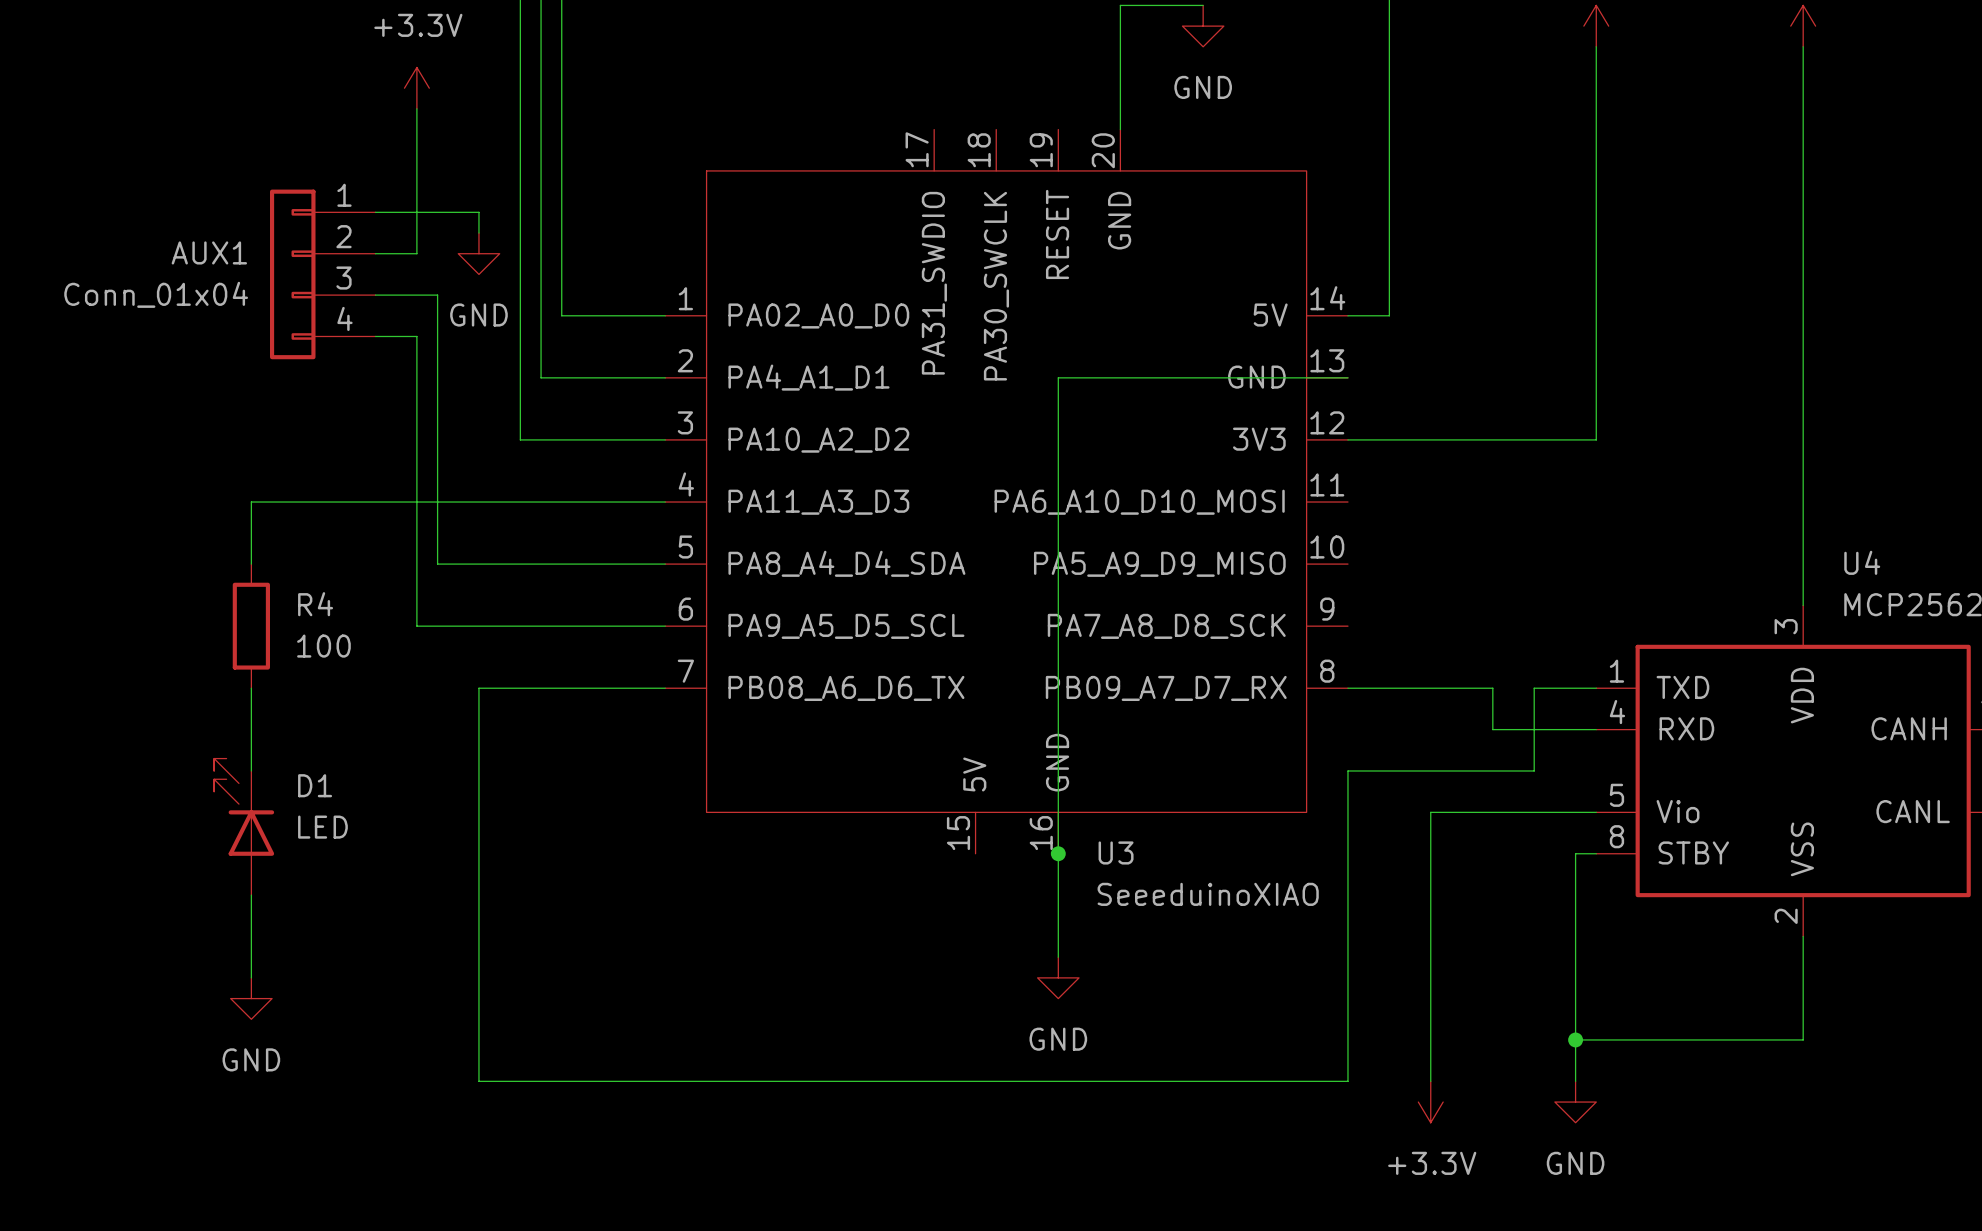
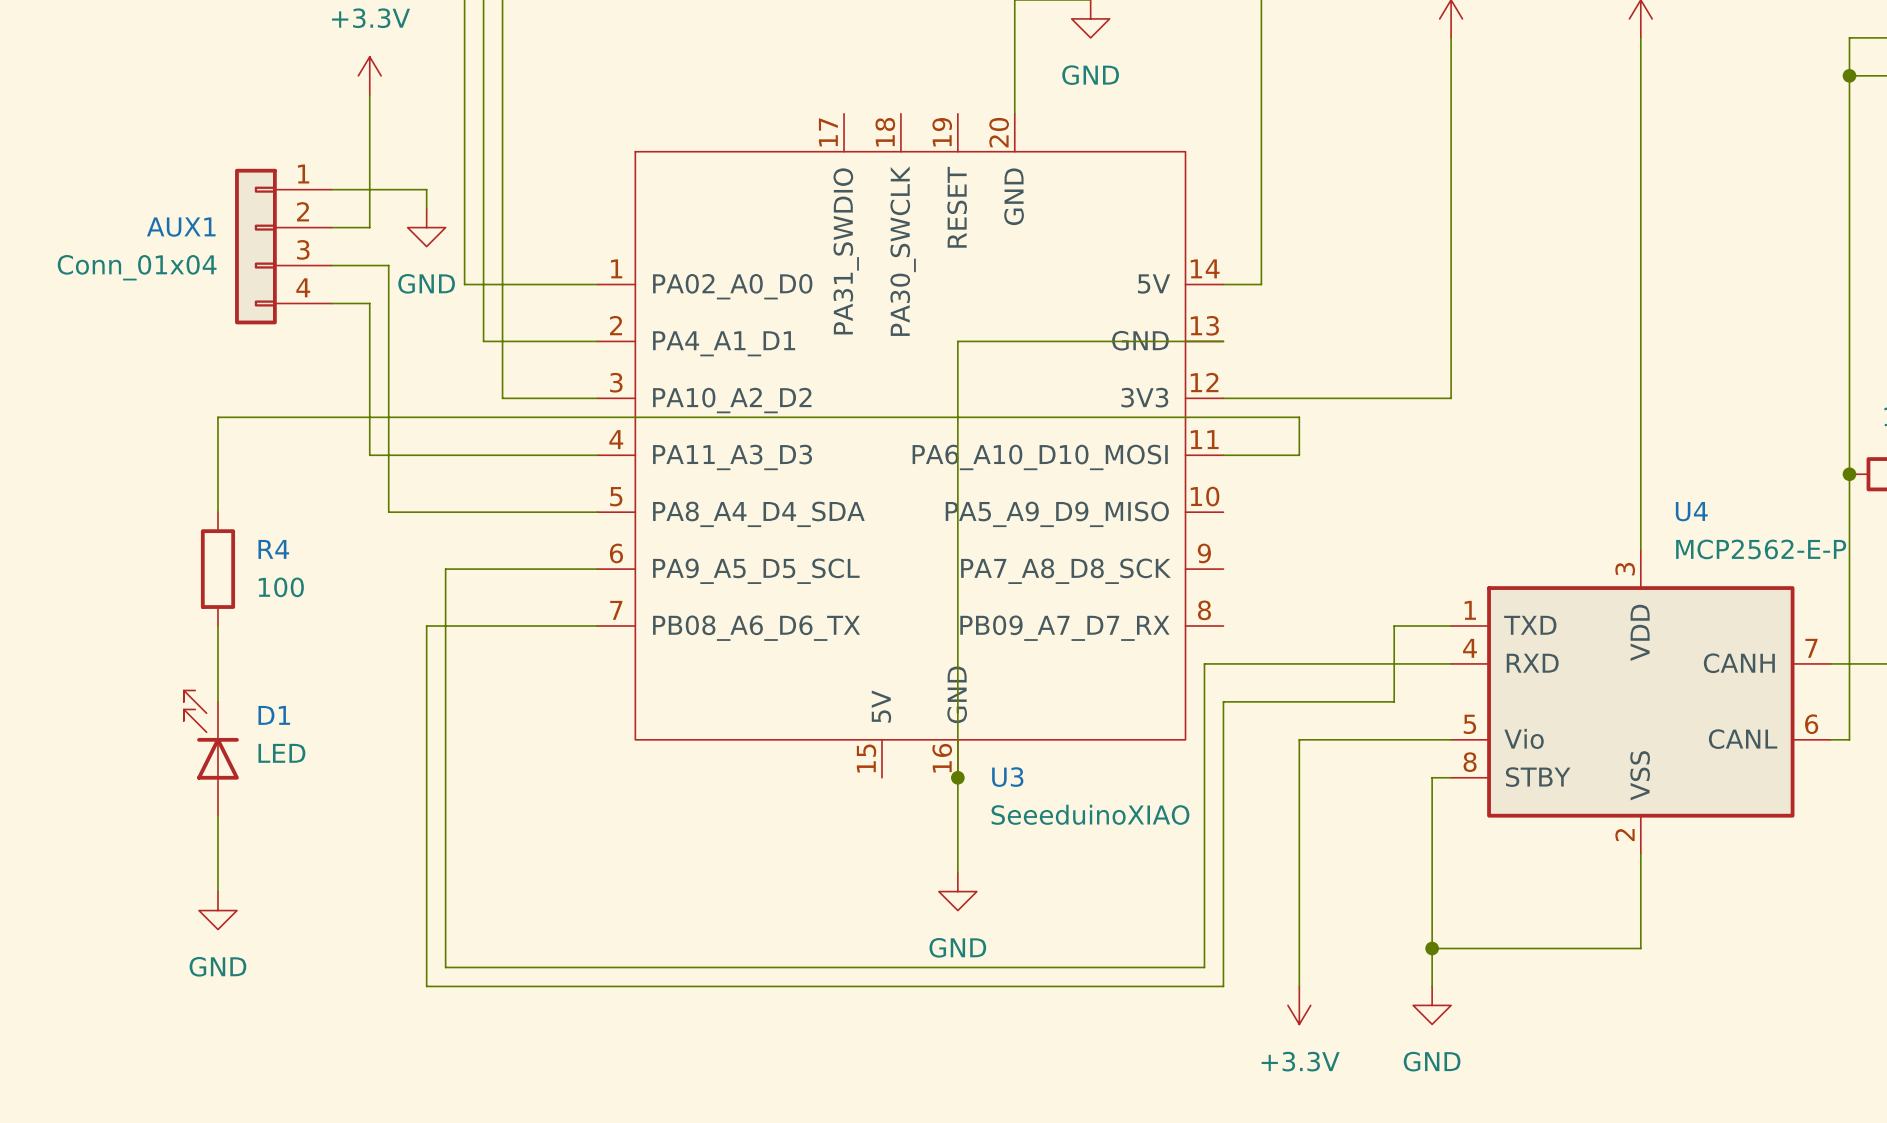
wire: (520, 315) (520, 439) (561, 439) -> (464, 284) (502, 284) (502, 398)
wire: (251, 502) (416, 502) (416, 626) (499, 626) -> (217, 455) (217, 417) (1299, 417) (1299, 455) (1223, 455)
wire: (1347, 688) (1492, 688) (1492, 729) -> (445, 569) (445, 967) (1204, 967) (1204, 663) (1356, 663)

